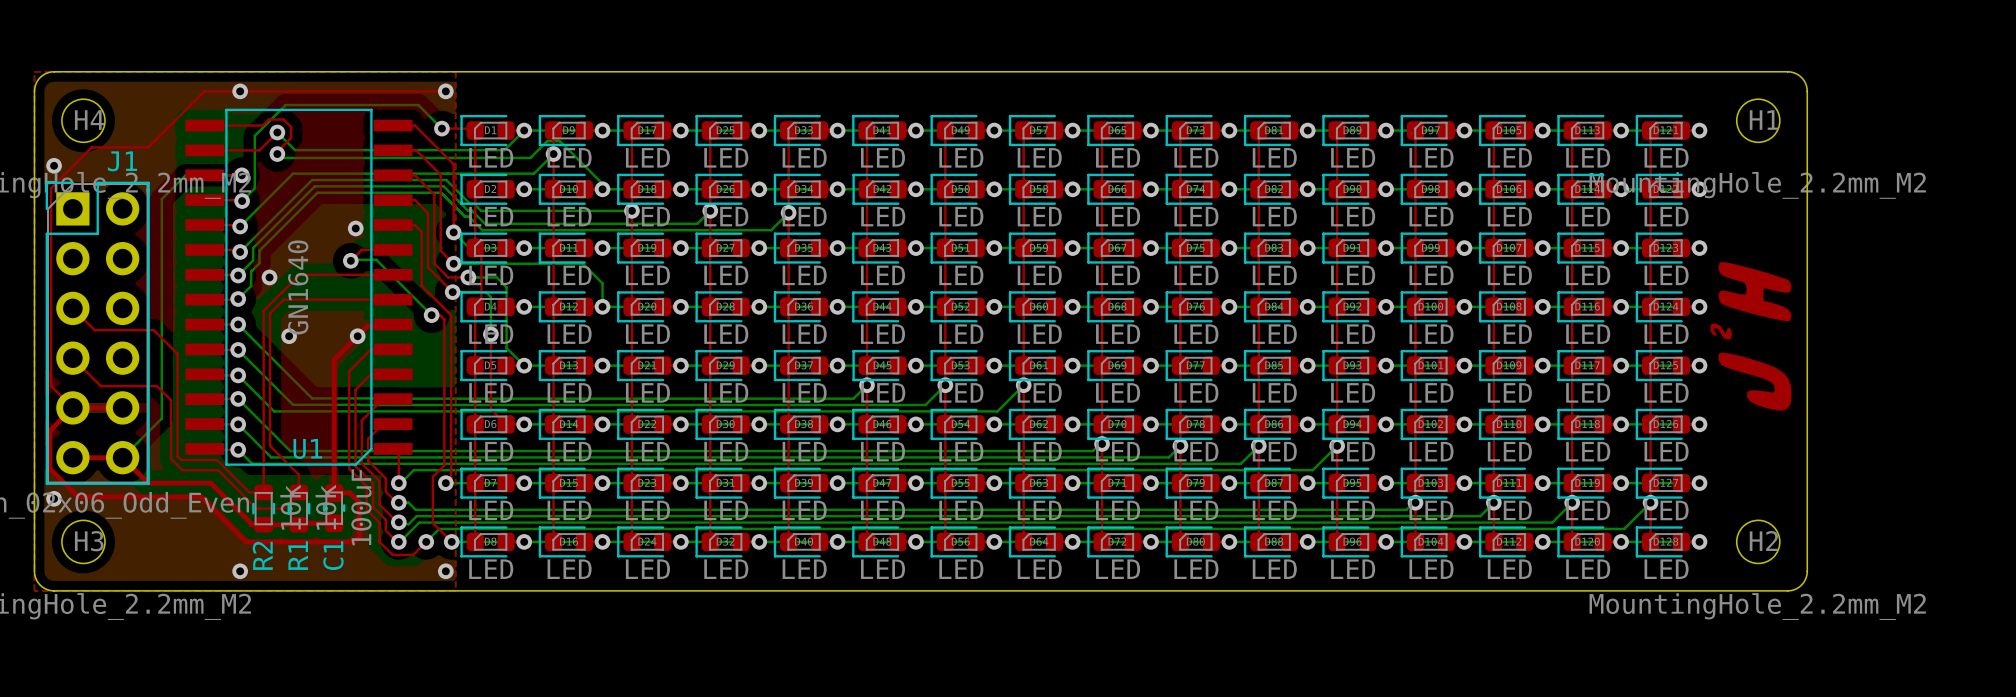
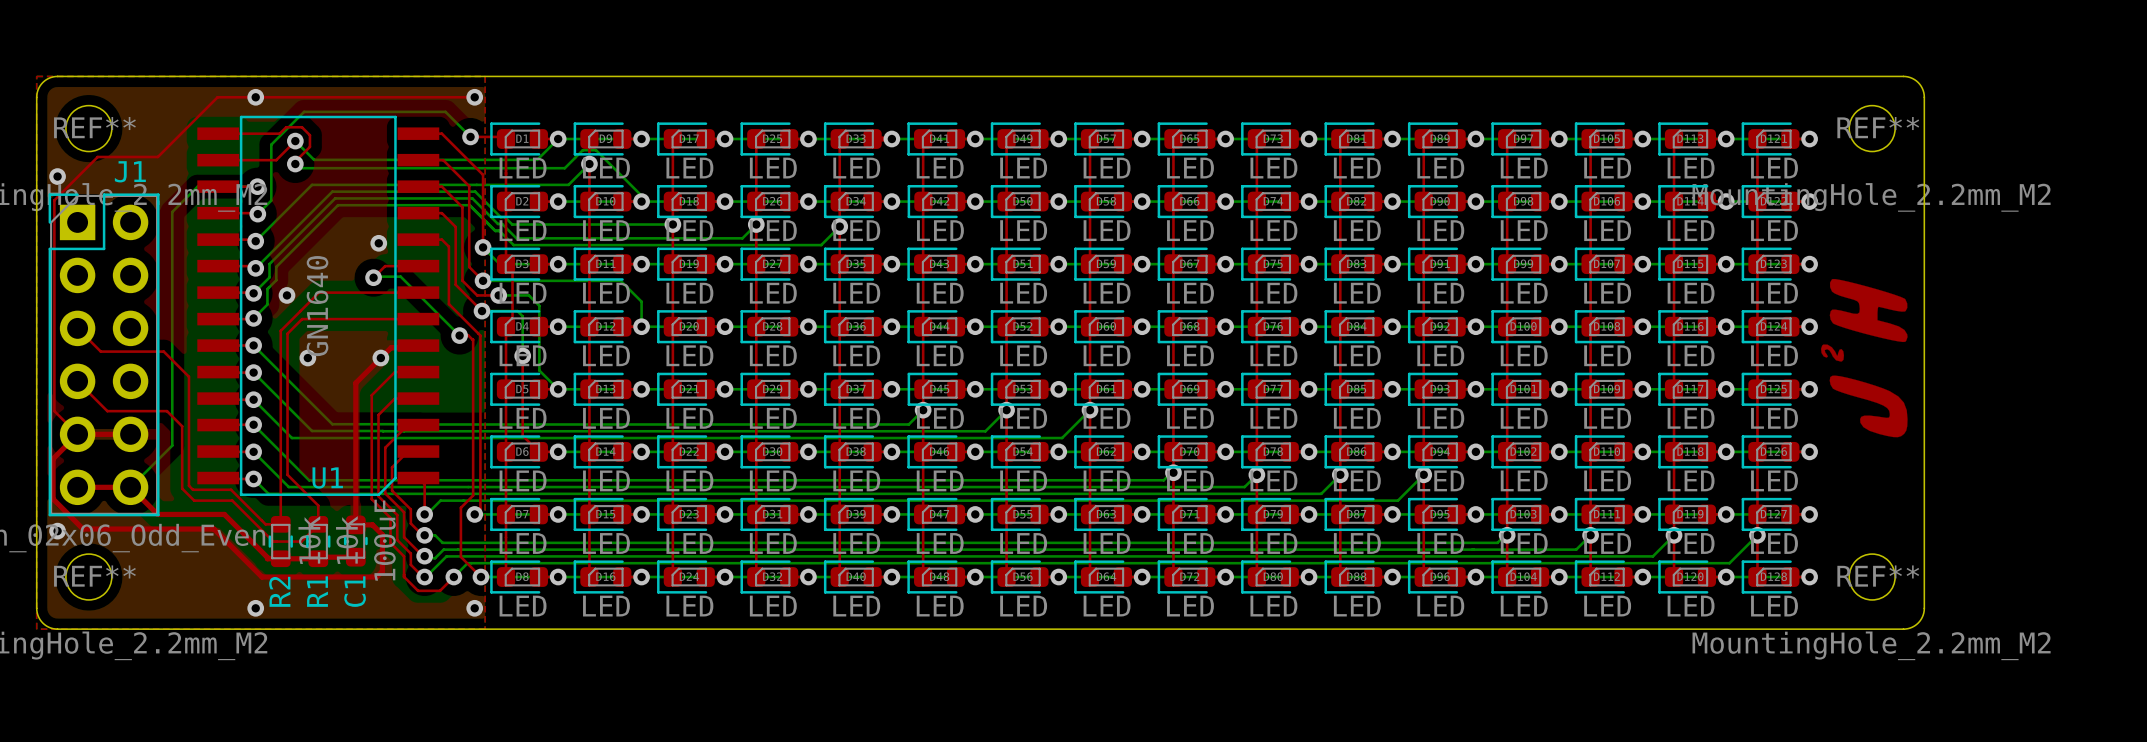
H4 name: H4 (89, 120) -> REF** (94, 127)
H1 name: H1 (1764, 120) -> REF** (1878, 127)
H3 name: H3 (89, 541) -> REF** (94, 576)
H2 name: H2 (1763, 541) -> REF** (1878, 576)

